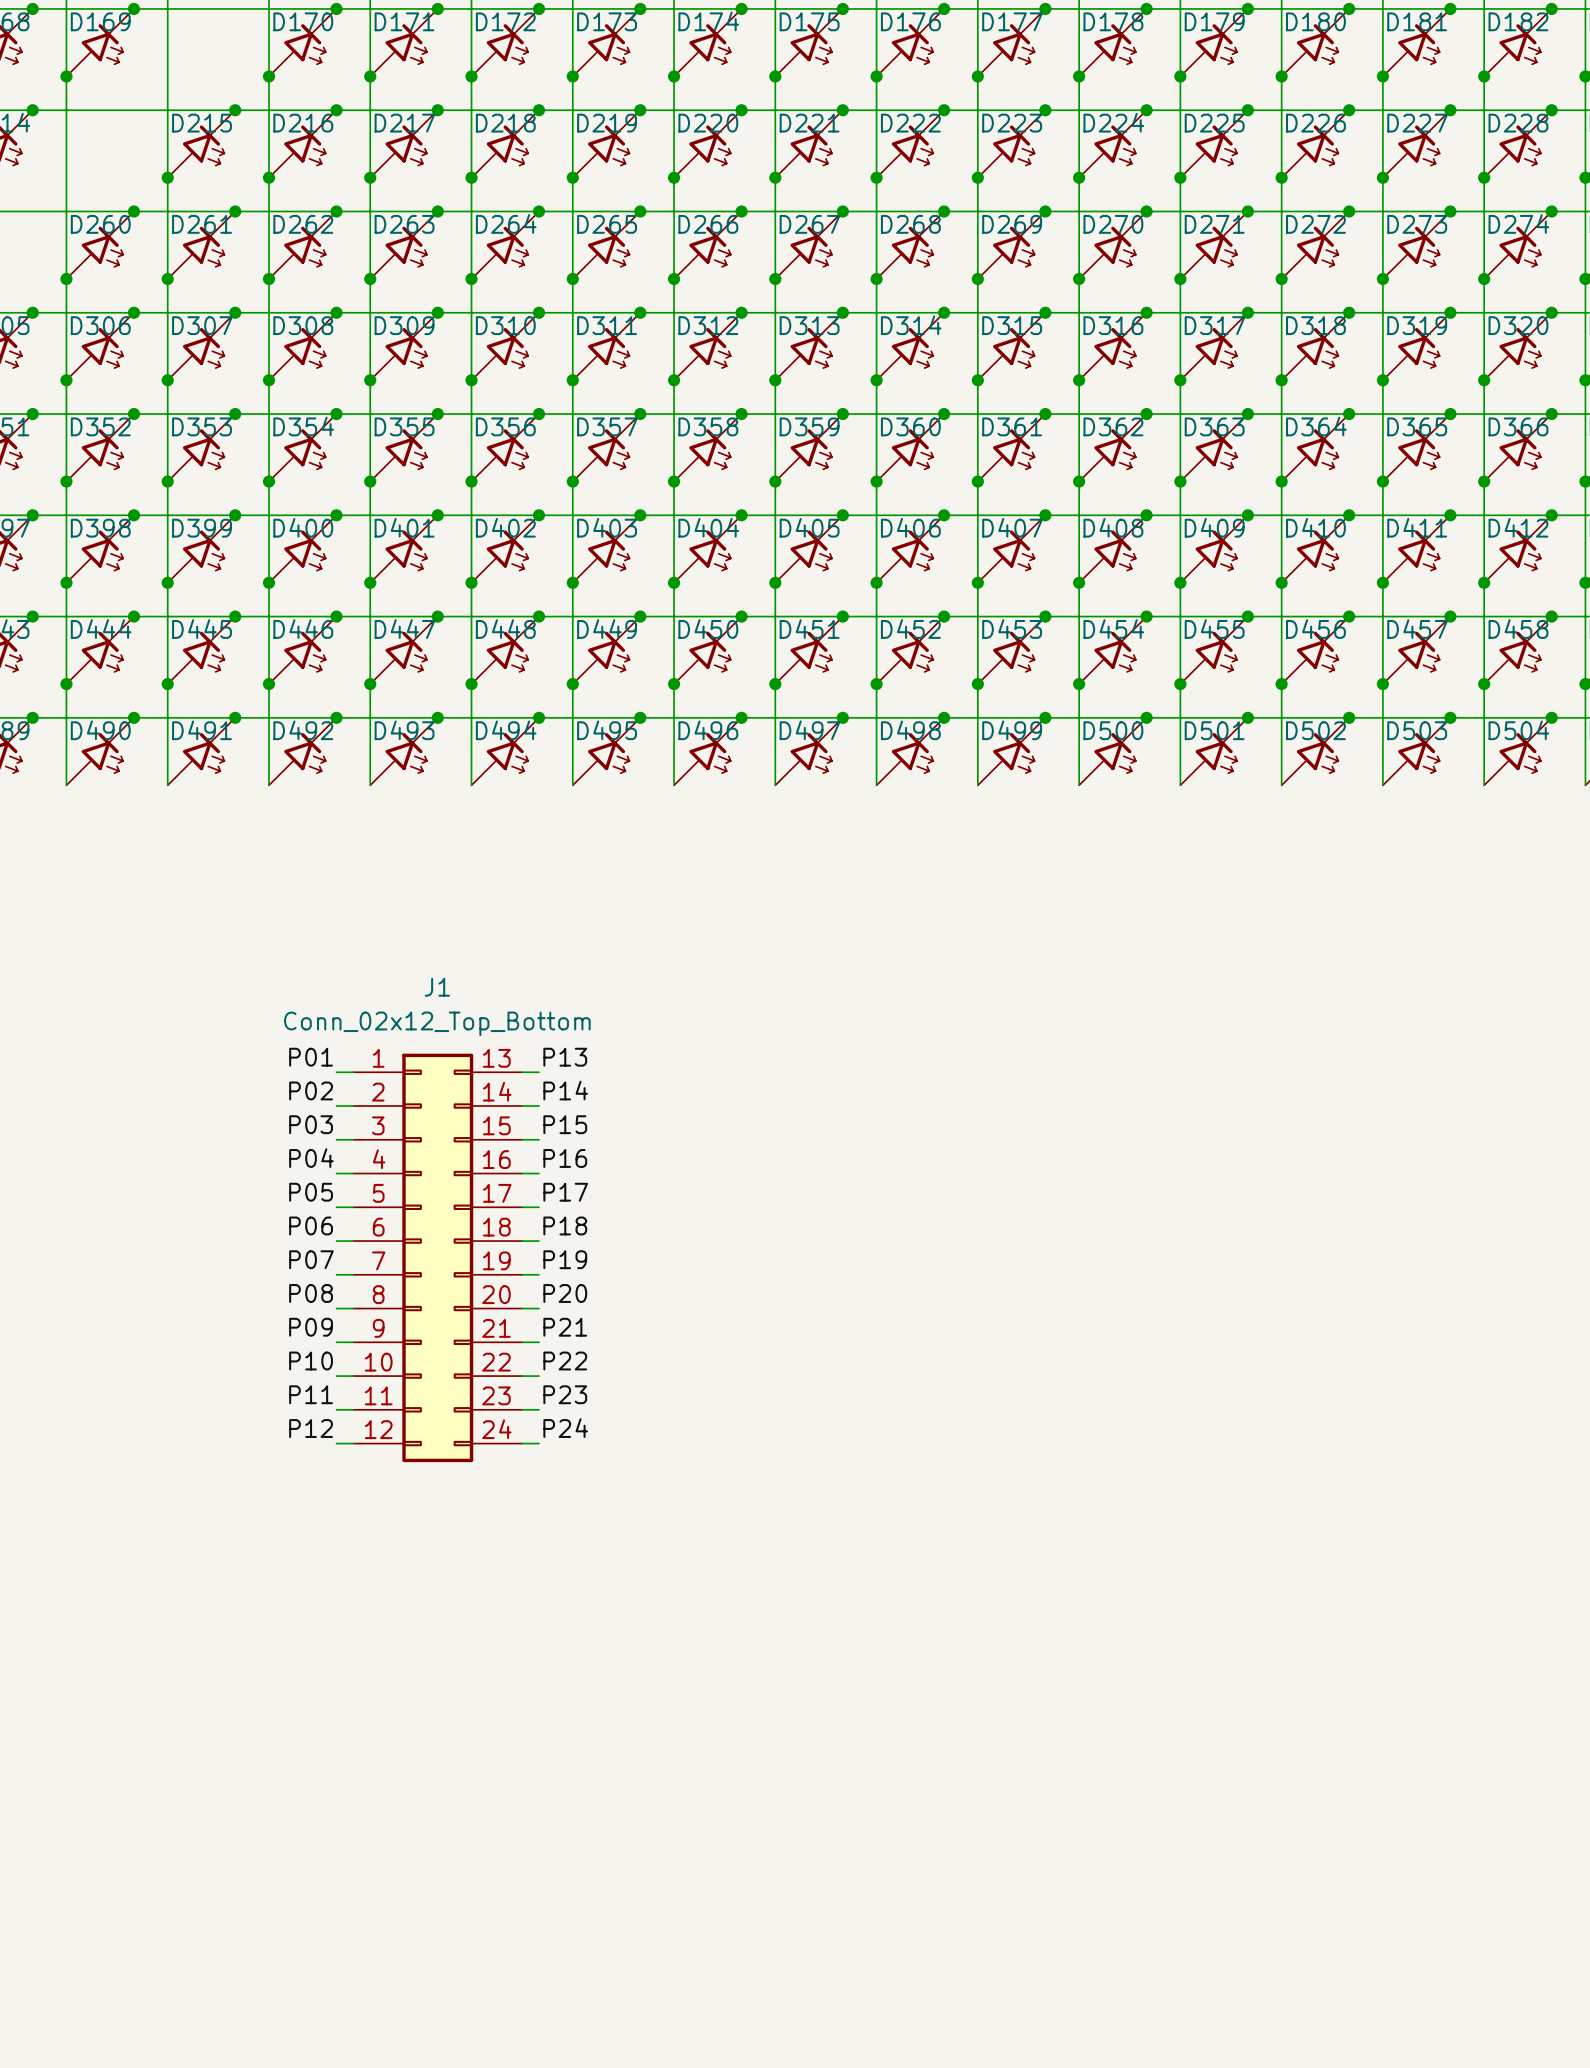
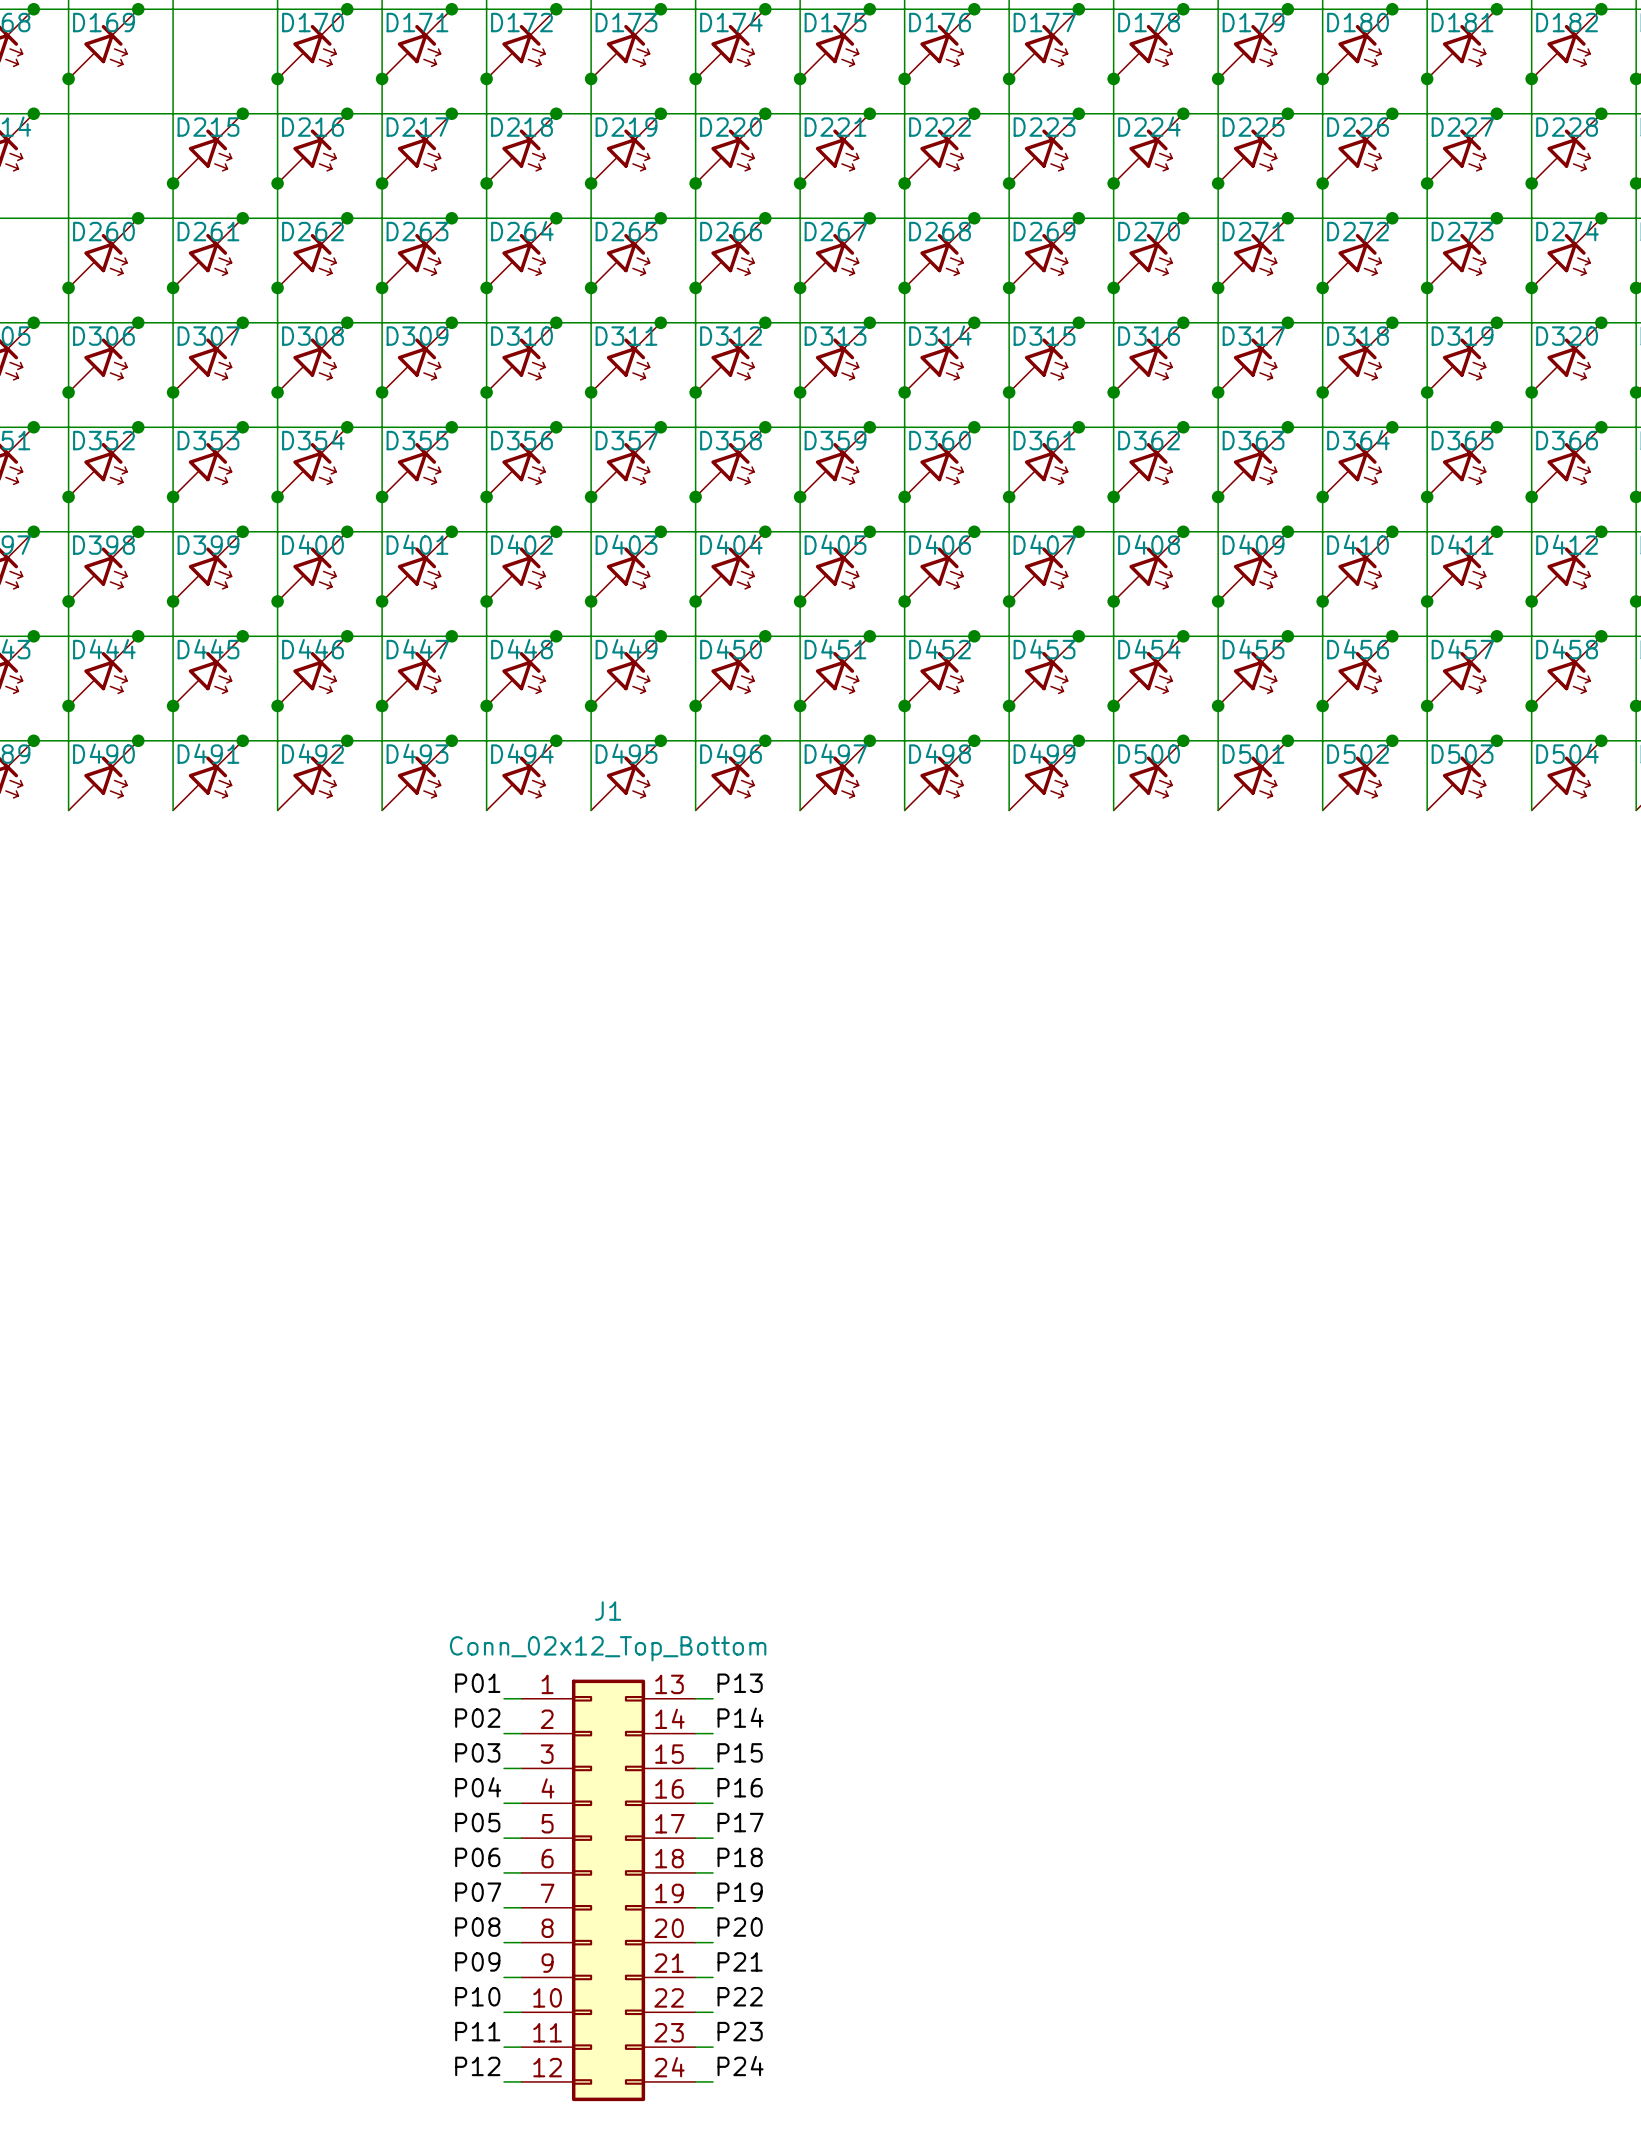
label: P01 (311, 1057) -> none
label: P13 (565, 1057) -> none
wire: (336, 1072) (353, 1072) -> none
wire: (522, 1072) (539, 1072) -> none
label: P02 (311, 1090) -> none
label: P14 (565, 1090) -> none
wire: (336, 1106) (353, 1106) -> none
wire: (522, 1106) (539, 1106) -> none
label: P03 (311, 1124) -> none
label: P15 (565, 1124) -> none
wire: (336, 1139) (353, 1139) -> none
wire: (522, 1139) (539, 1139) -> none
label: P04 (311, 1158) -> none
label: P16 (565, 1158) -> none
wire: (336, 1173) (353, 1173) -> none
wire: (522, 1173) (539, 1173) -> none
label: P05 (311, 1192) -> none
label: P17 (565, 1192) -> none
wire: (336, 1207) (353, 1207) -> none
wire: (522, 1207) (539, 1207) -> none
label: P06 (311, 1225) -> none
label: P18 (565, 1225) -> none
wire: (336, 1241) (353, 1241) -> none
wire: (522, 1241) (539, 1241) -> none
J1 position: (437, 1257) -> (608, 1890)
label: P07 (311, 1259) -> none
label: P19 (565, 1259) -> none
wire: (336, 1274) (353, 1274) -> none
wire: (522, 1274) (539, 1274) -> none
label: P08 (311, 1293) -> none
label: P20 (565, 1293) -> none
wire: (336, 1308) (353, 1308) -> none
wire: (522, 1308) (539, 1308) -> none
label: P09 (311, 1327) -> none
label: P21 (565, 1327) -> none
wire: (336, 1342) (353, 1342) -> none
wire: (522, 1342) (539, 1342) -> none
label: P10 (311, 1360) -> none
label: P22 (565, 1360) -> none
wire: (336, 1376) (353, 1376) -> (504, 1698) (521, 1698)
wire: (522, 1376) (539, 1376) -> (695, 1698) (713, 1698)
label: P11 (311, 1394) -> none
label: P23 (565, 1394) -> none
wire: (336, 1409) (353, 1409) -> (504, 1733) (521, 1733)
wire: (522, 1409) (539, 1409) -> (695, 1733) (713, 1733)
label: P12 (311, 1428) -> none
label: P24 (565, 1428) -> none
wire: (336, 1443) (353, 1443) -> (504, 1768) (521, 1768)
wire: (522, 1443) (539, 1443) -> (695, 1768) (713, 1768)
label: none -> P01 (477, 1683)
label: none -> P13 (740, 1683)
label: none -> P02 (477, 1718)
label: none -> P14 (740, 1717)
label: none -> P03 (477, 1752)
label: none -> P15 (740, 1752)
label: none -> P04 (478, 1787)
label: none -> P16 (740, 1787)
wire: none -> (504, 1803) (521, 1803)
wire: none -> (695, 1803) (713, 1803)
label: none -> P05 (477, 1822)
label: none -> P17 (740, 1822)
wire: none -> (504, 1838) (521, 1838)
wire: none -> (695, 1838) (713, 1838)
label: none -> P06 (477, 1857)
label: none -> P18 (740, 1857)
wire: none -> (504, 1872) (521, 1872)
wire: none -> (695, 1872) (713, 1872)
label: none -> P07 (478, 1892)
label: none -> P19 (740, 1892)
wire: none -> (504, 1907) (521, 1907)
wire: none -> (695, 1907) (713, 1907)
label: none -> P08 (477, 1927)
label: none -> P20 (740, 1927)
wire: none -> (504, 1942) (521, 1942)
wire: none -> (695, 1942) (713, 1942)
label: none -> P09 (477, 1961)
label: none -> P21 (740, 1961)
wire: none -> (504, 1977) (521, 1977)
wire: none -> (695, 1977) (713, 1977)
label: none -> P10 (477, 1996)
label: none -> P22 (740, 1996)
wire: none -> (504, 2012) (521, 2012)
wire: none -> (695, 2012) (713, 2012)
label: none -> P11 (477, 2031)
label: none -> P23 (740, 2031)
wire: none -> (504, 2047) (521, 2047)
wire: none -> (695, 2047) (713, 2047)
label: none -> P24 (740, 2066)
label: none -> P12 (477, 2066)
wire: none -> (504, 2081) (521, 2081)
wire: none -> (695, 2081) (713, 2081)

